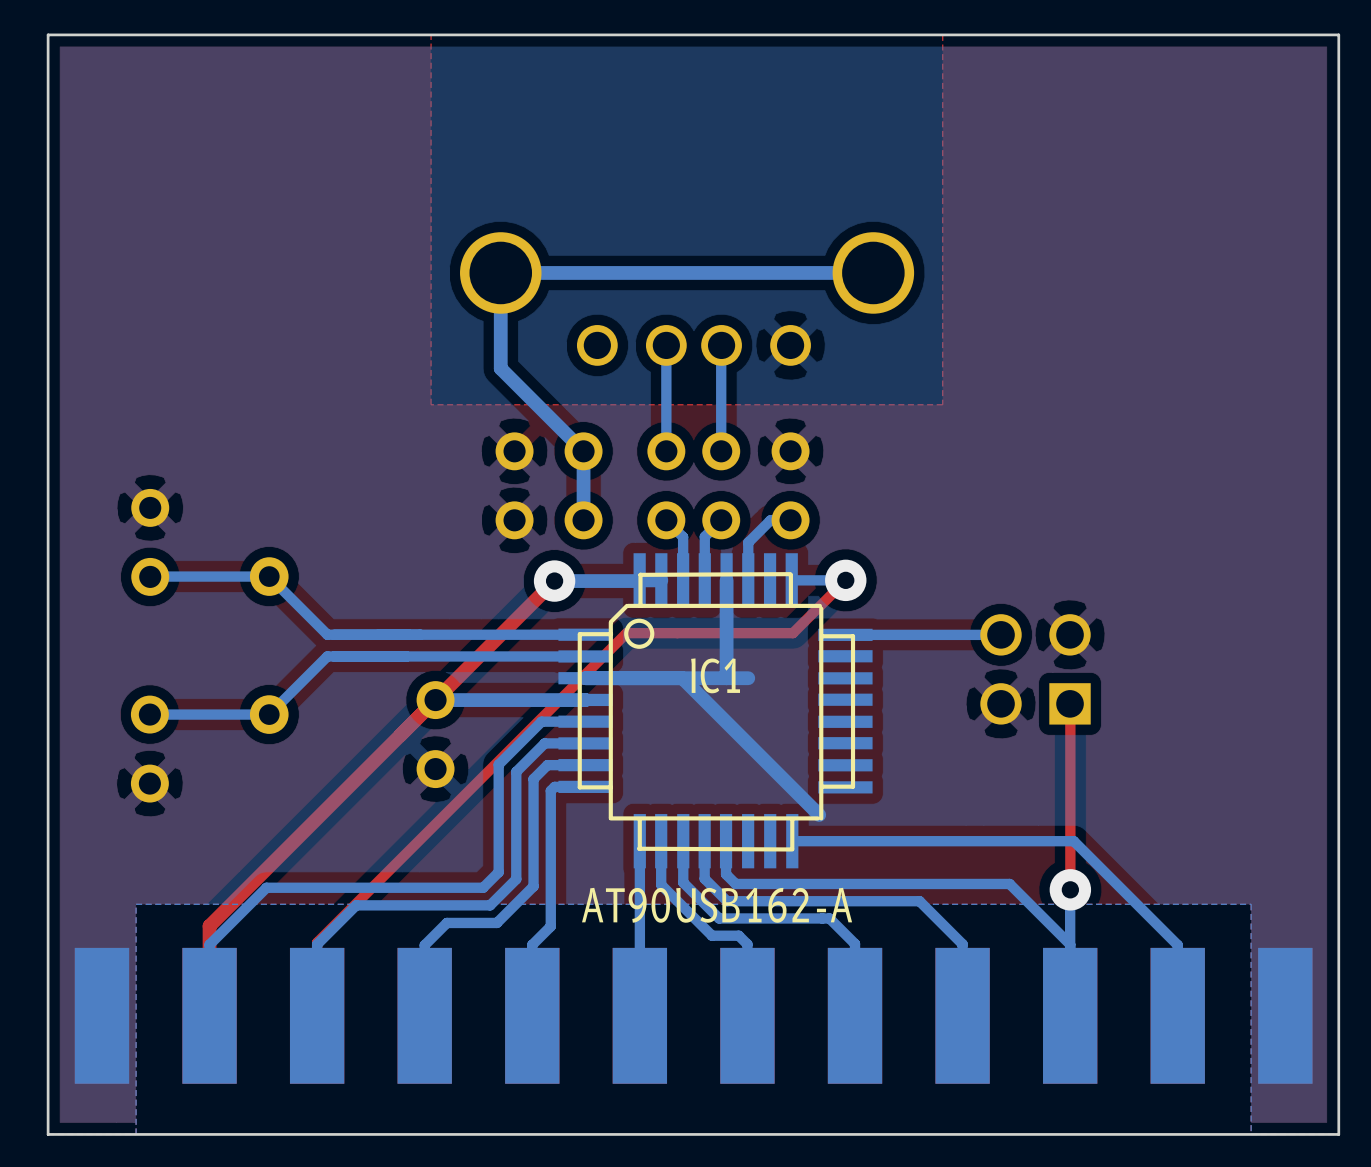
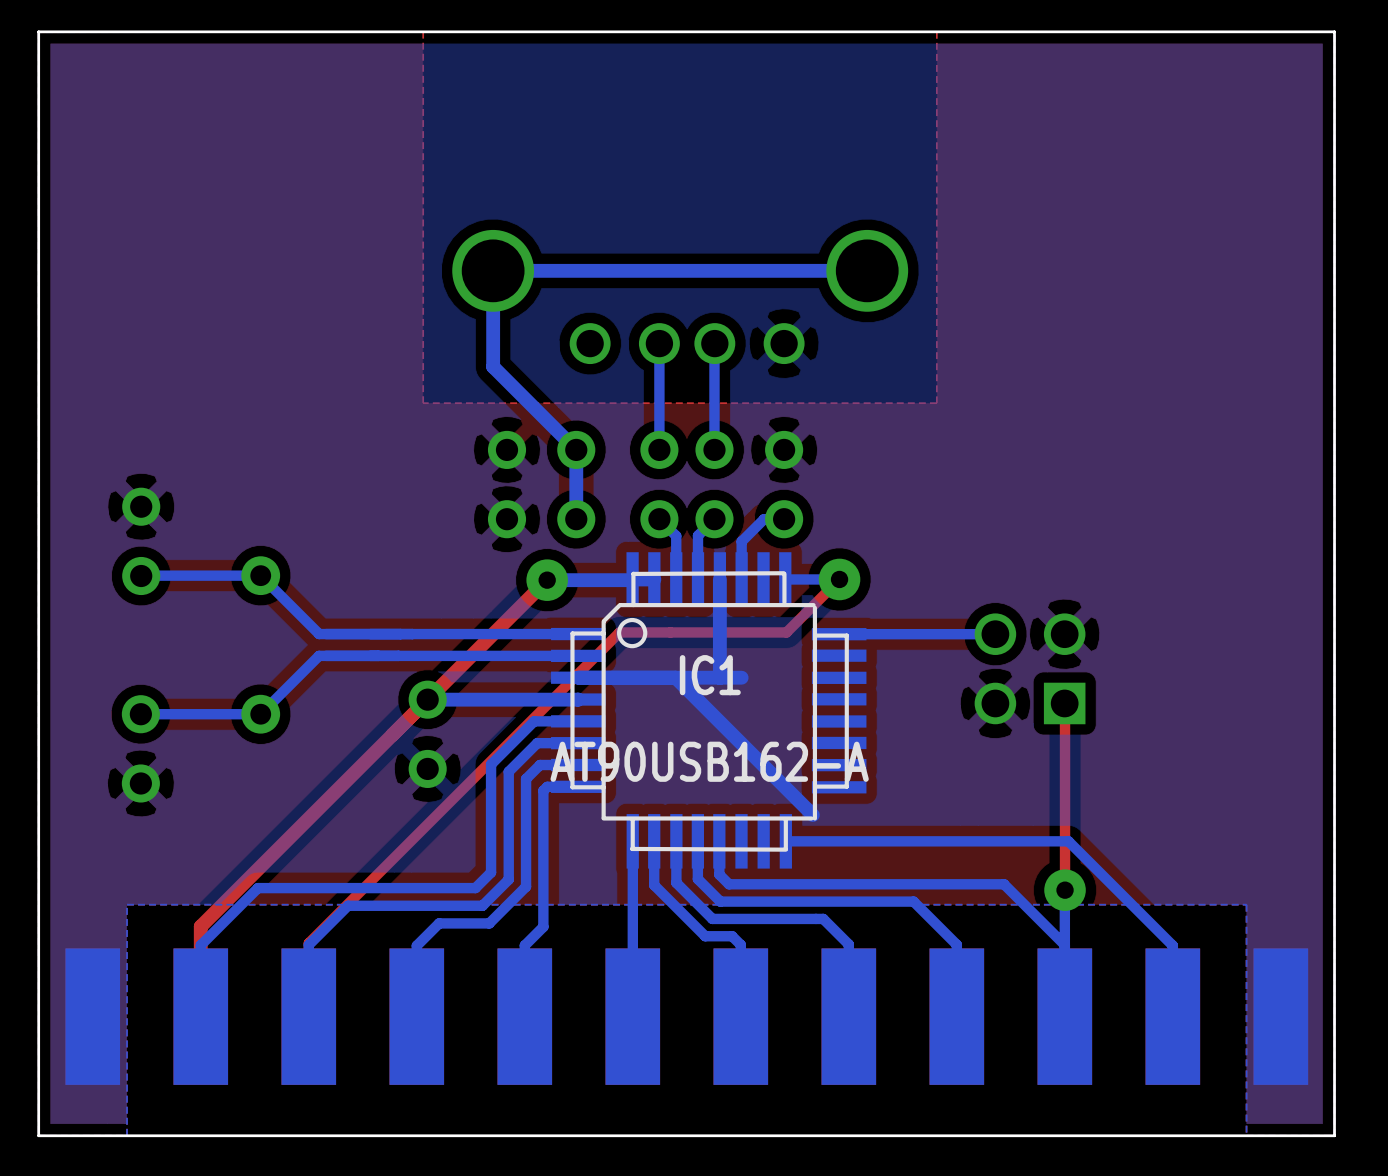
IC1 value position: AT90USB162-A (717, 905) -> AT90USB162-A (709, 761)

